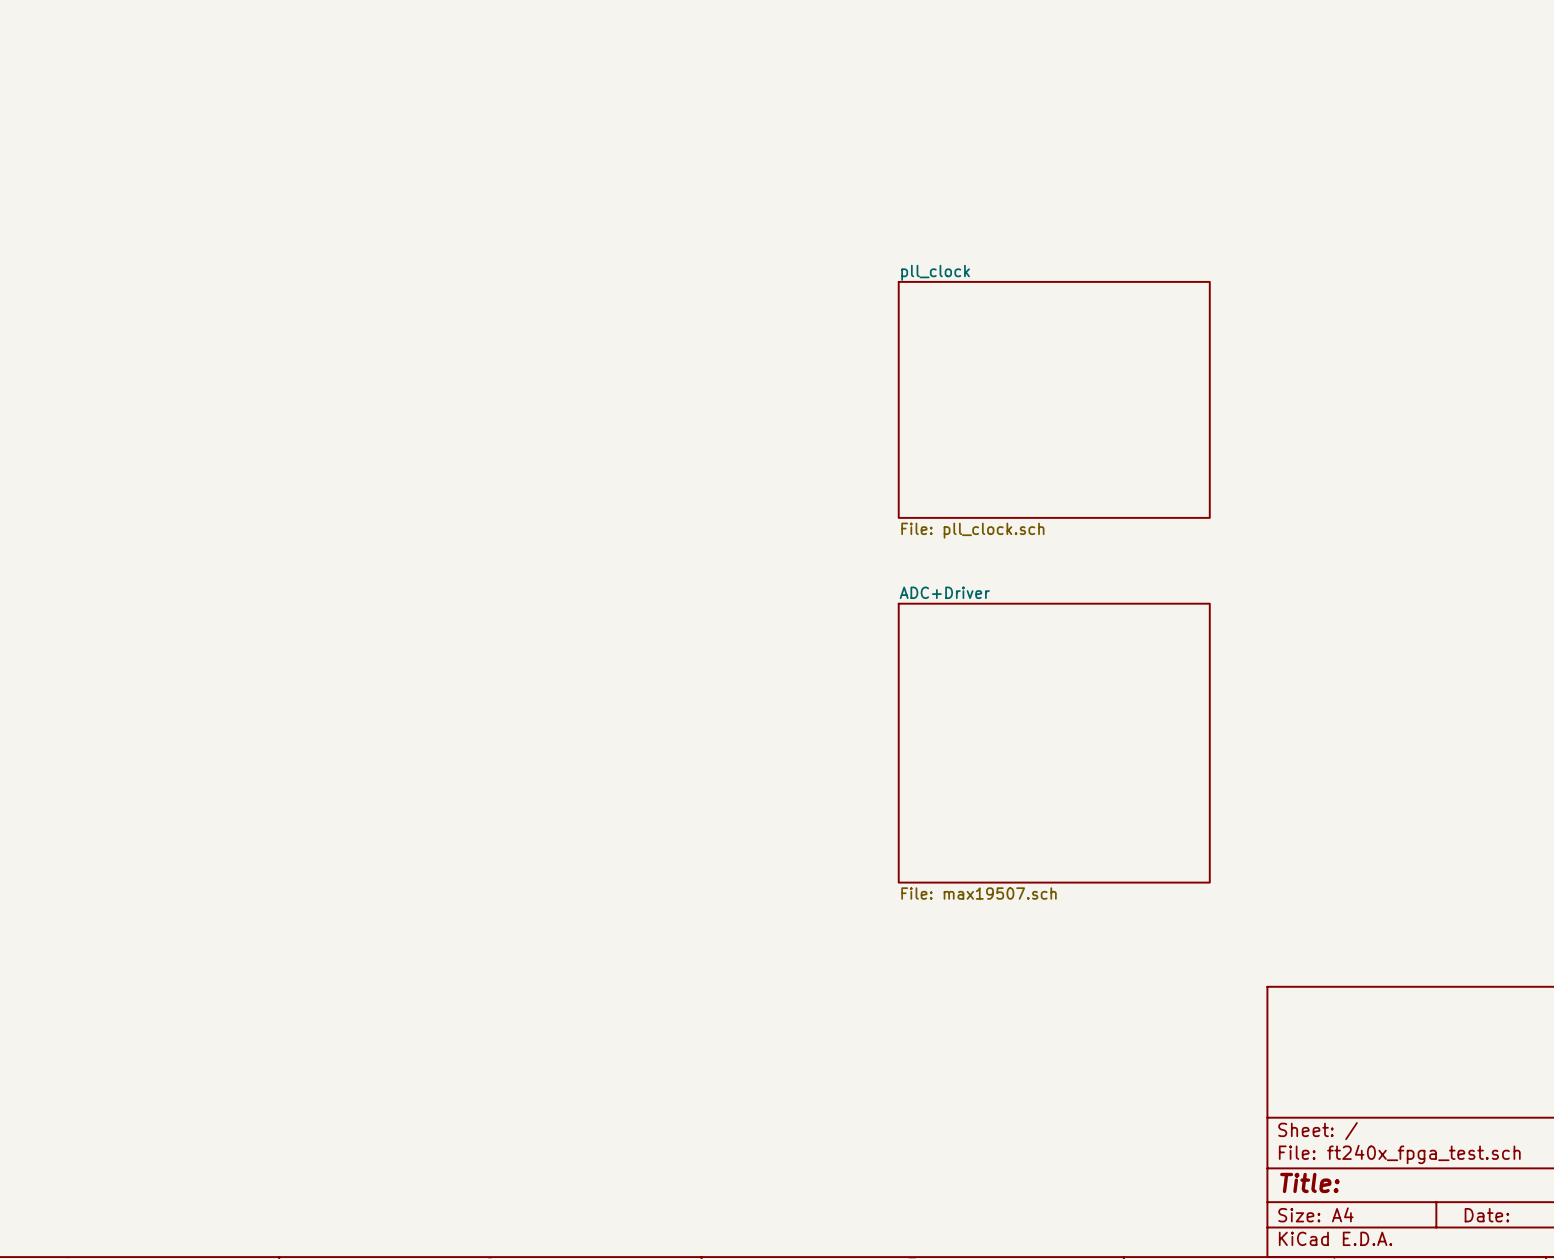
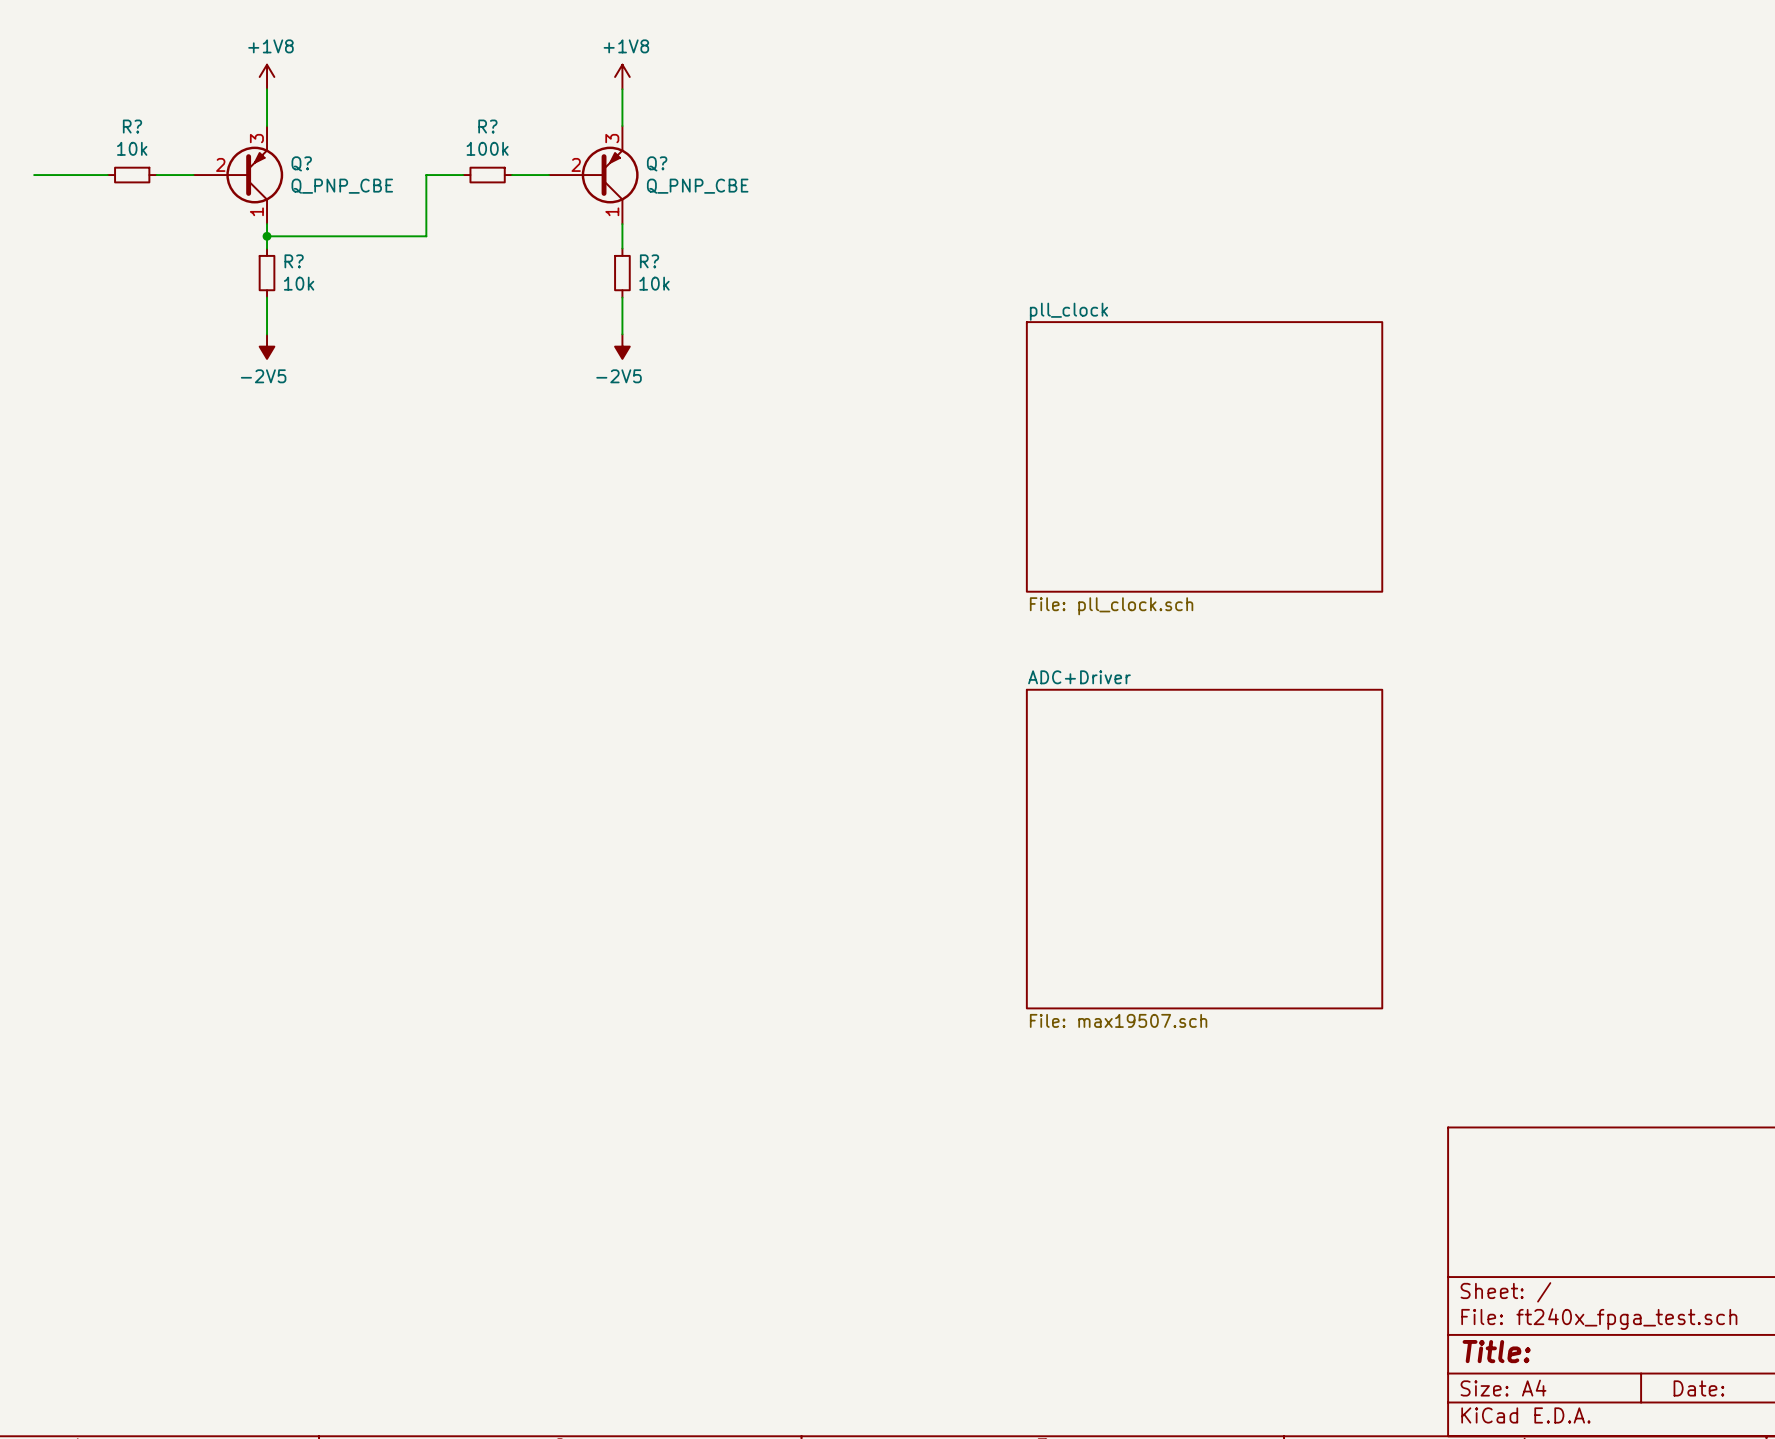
power symbol: none -> +1V8 (267, 76)
power symbol: none -> +1V8 (622, 76)
wire: none -> (267, 89) (267, 126)
wire: none -> (622, 89) (622, 126)
wire: none -> (34, 175) (107, 175)
R?: none -> 10k (132, 175)
wire: none -> (156, 175) (193, 175)
Q?: none -> Q_PNP_CBE (238, 175)
wire: none -> (463, 175) (426, 175) (426, 236) (267, 236)
R?: none -> 100k (487, 175)
wire: none -> (512, 175) (548, 175)
Q?: none -> Q_PNP_CBE (593, 175)
wire: none -> (267, 224) (267, 248)
wire: none -> (622, 224) (622, 248)
junction: none -> (267, 236)
R?: none -> 10k (267, 273)
R?: none -> 10k (622, 273)
wire: none -> (267, 297) (267, 334)
wire: none -> (622, 297) (622, 334)
power symbol: none -> -2V5 (267, 346)
power symbol: none -> -2V5 (622, 346)

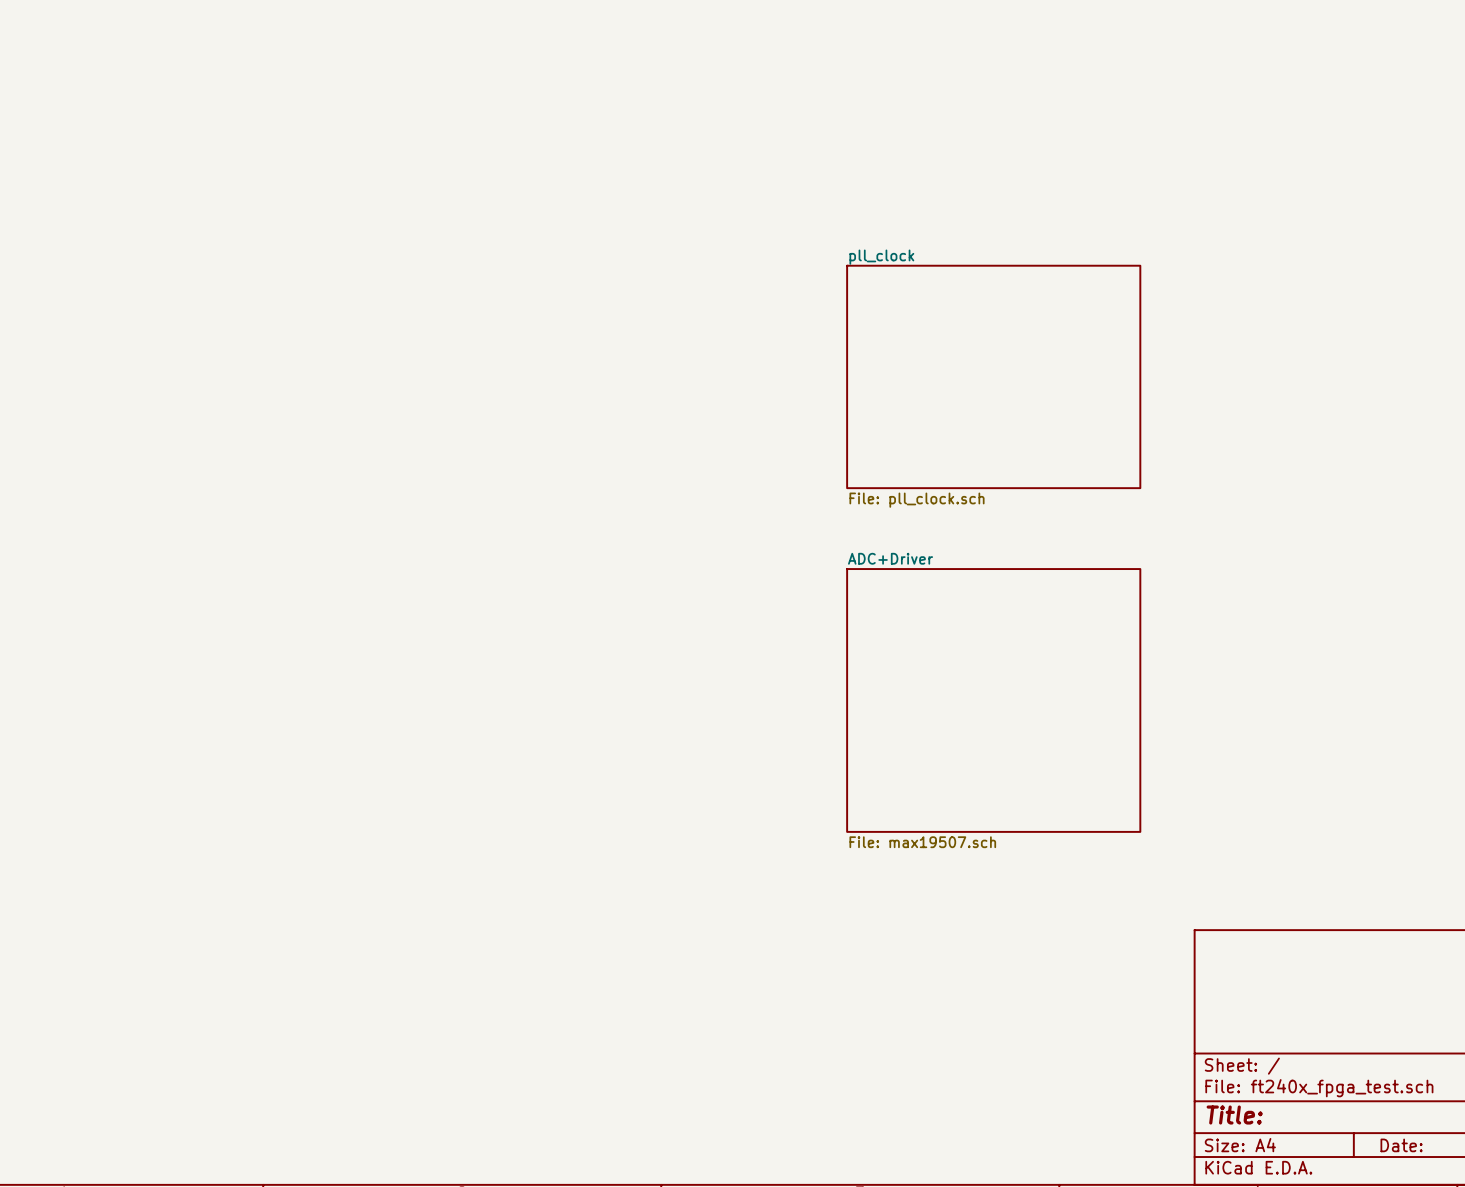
power symbol: +1V8 (267, 76) -> none
power symbol: +1V8 (622, 76) -> none
wire: (267, 89) (267, 126) -> none
wire: (622, 89) (622, 126) -> none
wire: (34, 175) (107, 175) -> none
R?: 10k (132, 175) -> none
wire: (156, 175) (193, 175) -> none
Q?: Q_PNP_CBE (238, 175) -> none
wire: (463, 175) (426, 175) (426, 236) (267, 236) -> none
R?: 100k (487, 175) -> none
wire: (512, 175) (548, 175) -> none
Q?: Q_PNP_CBE (593, 175) -> none
wire: (267, 224) (267, 248) -> none
wire: (622, 224) (622, 248) -> none
junction: (267, 236) -> none
R?: 10k (267, 273) -> none
R?: 10k (622, 273) -> none
wire: (267, 297) (267, 334) -> none
wire: (622, 297) (622, 334) -> none
power symbol: -2V5 (267, 346) -> none
power symbol: -2V5 (622, 346) -> none

